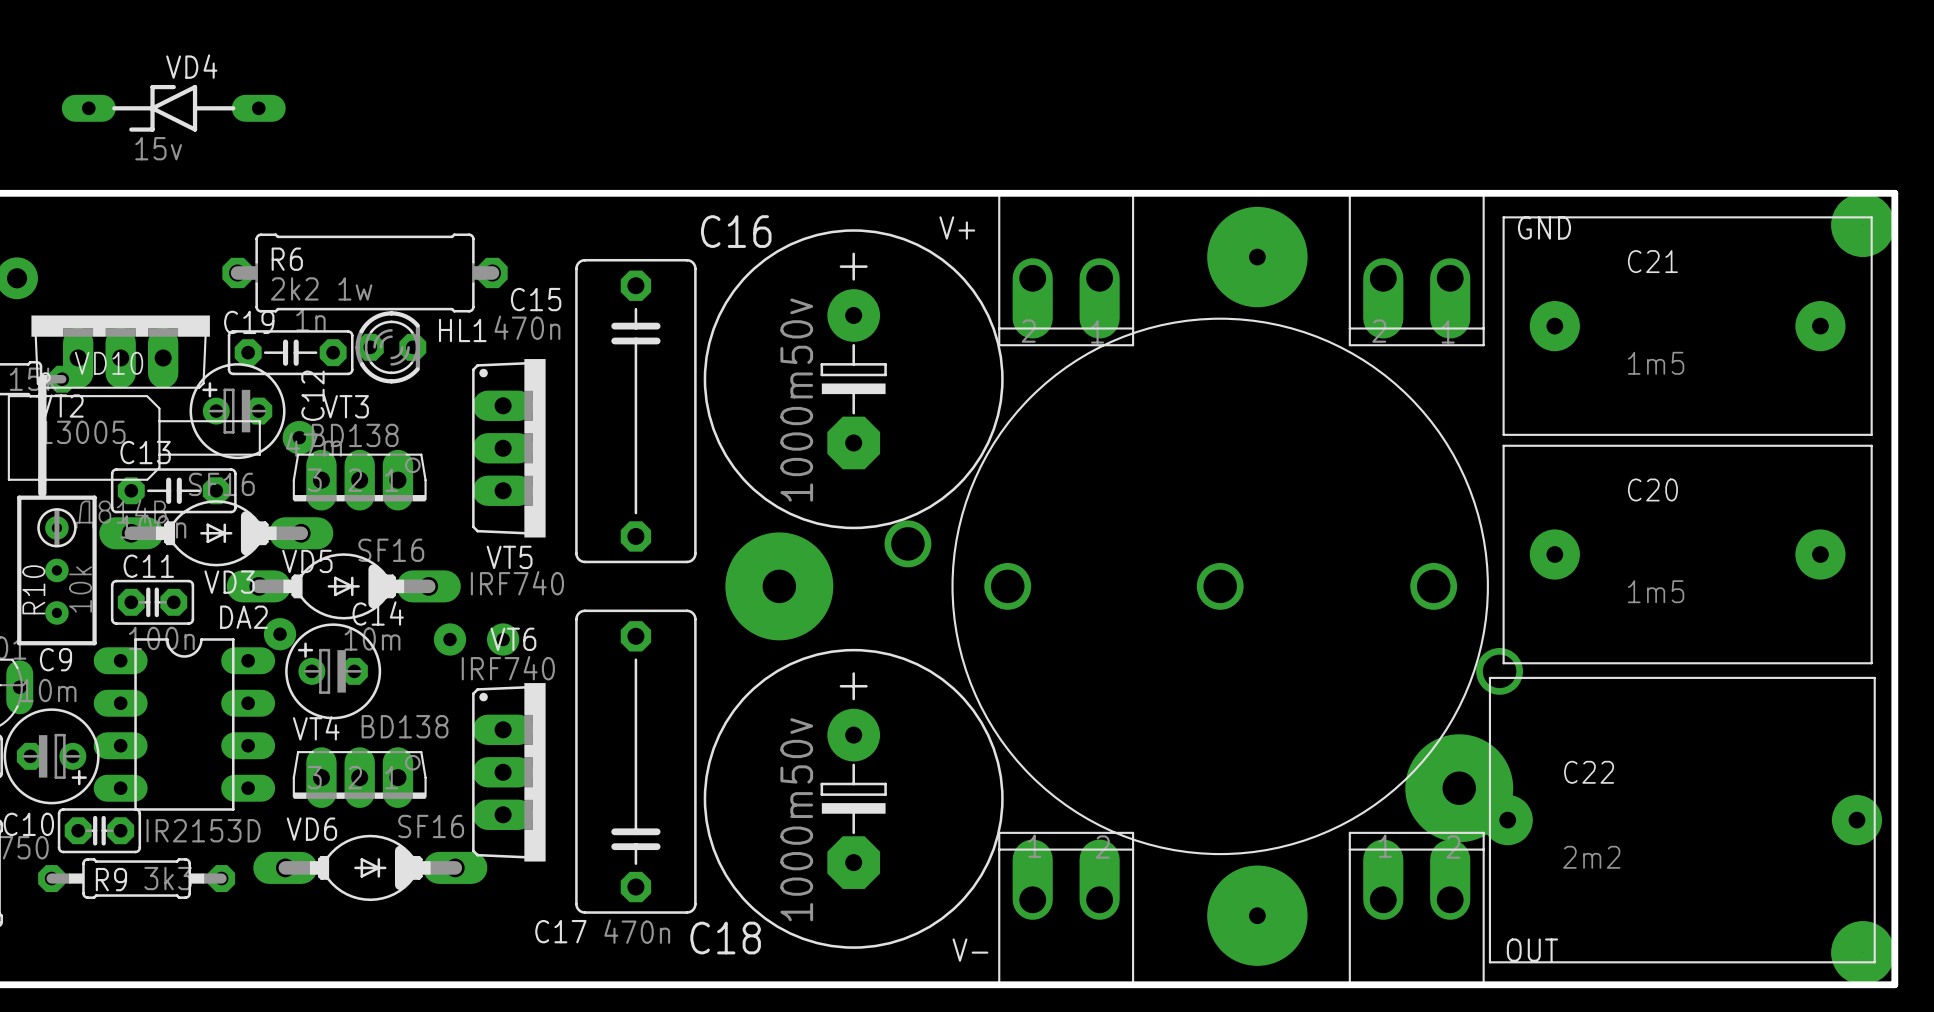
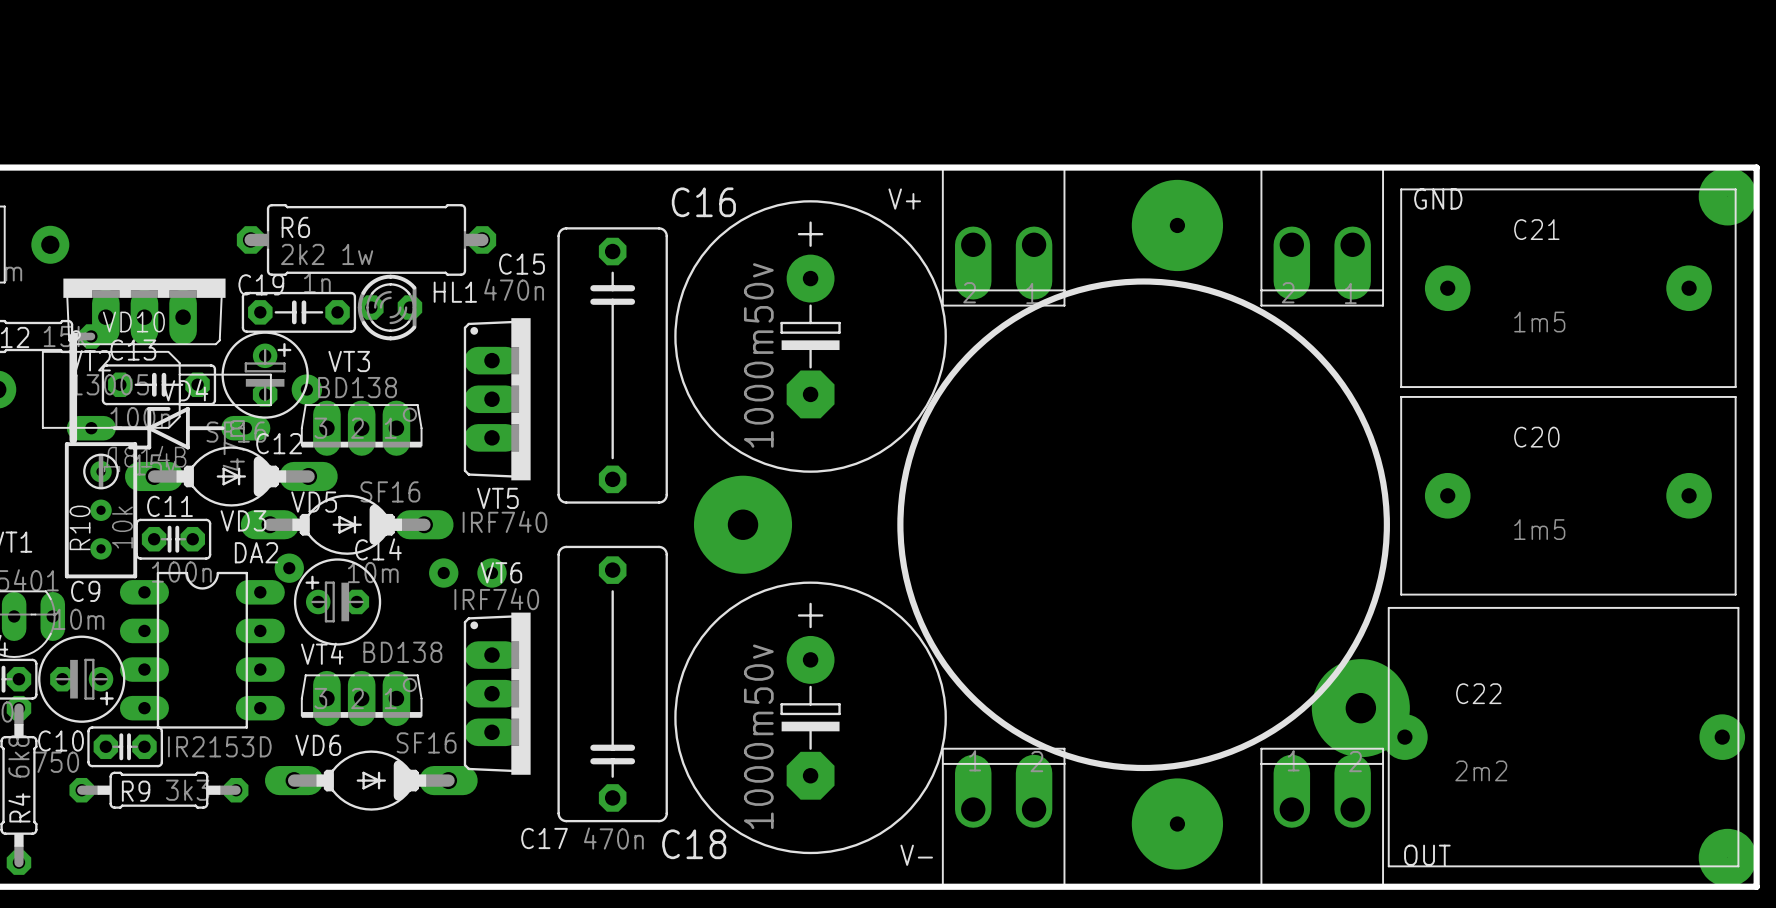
VD4 footprint: [61, 84, 286, 132] -> [66, 406, 271, 450]
drawing: none -> [897, 278, 1390, 772]
C12 rotation: 0° (237, 411) -> 90° clockwise (265, 375)
C13 position: (173, 490) -> (158, 384)
R10 position: (56, 570) -> (101, 510)
part: (1203, 586) -> none

